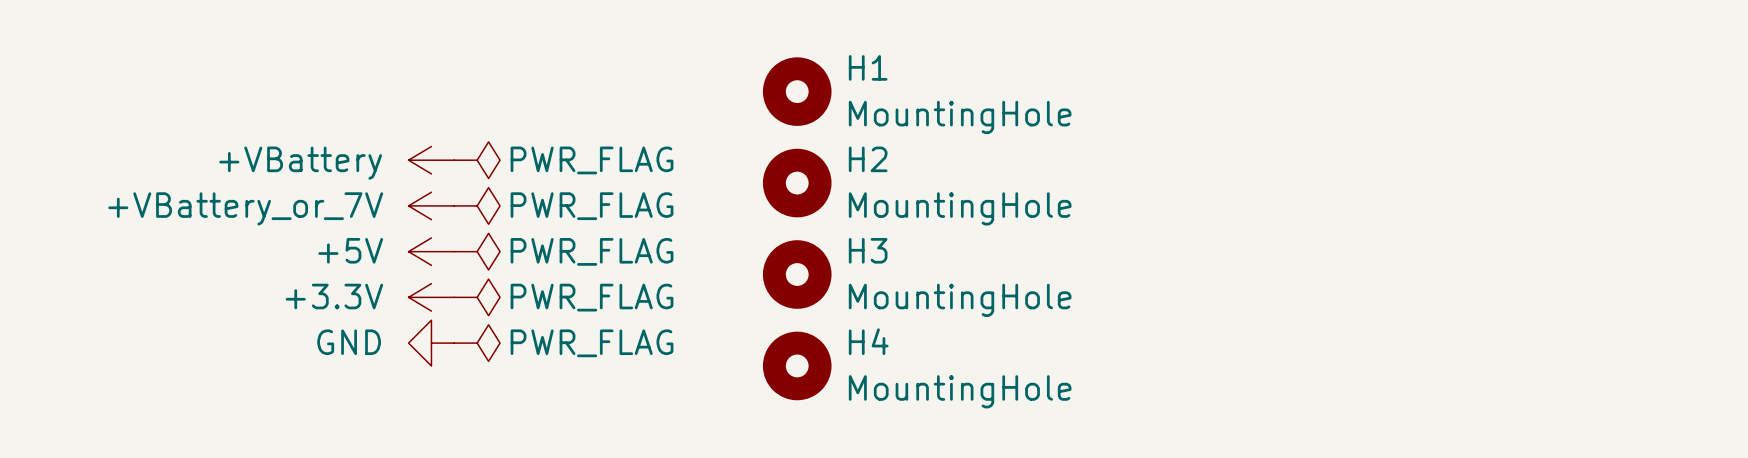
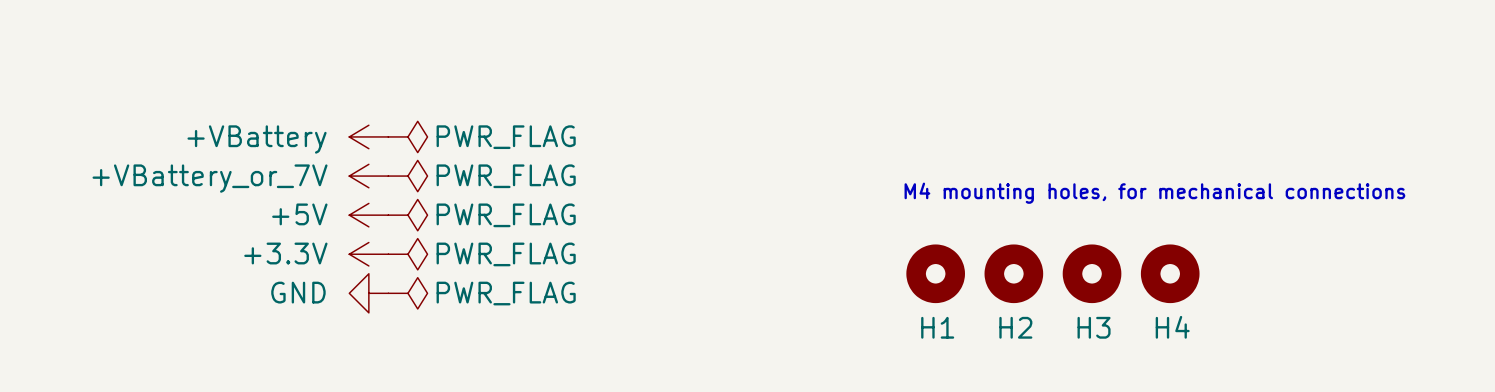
H1 name position: H1 (868, 67) -> H1 (937, 327)
H1 position: (797, 91) -> (935, 273)
H1 value: MountingHole (960, 117) -> none
H2 name position: H2 (868, 159) -> H2 (1015, 327)
H2 position: (797, 183) -> (1013, 273)
H2 value: MountingHole (960, 208) -> none
text: none -> M4 mounting holes, for mechanical connections (1154, 193)
H3 name position: H3 (868, 250) -> H3 (1094, 327)
H3 position: (797, 274) -> (1092, 273)
H3 value: MountingHole (960, 300) -> none
H4 name position: H4 (868, 341) -> H4 (1172, 327)
H4 position: (797, 365) -> (1170, 273)
H4 value: MountingHole (960, 391) -> none

